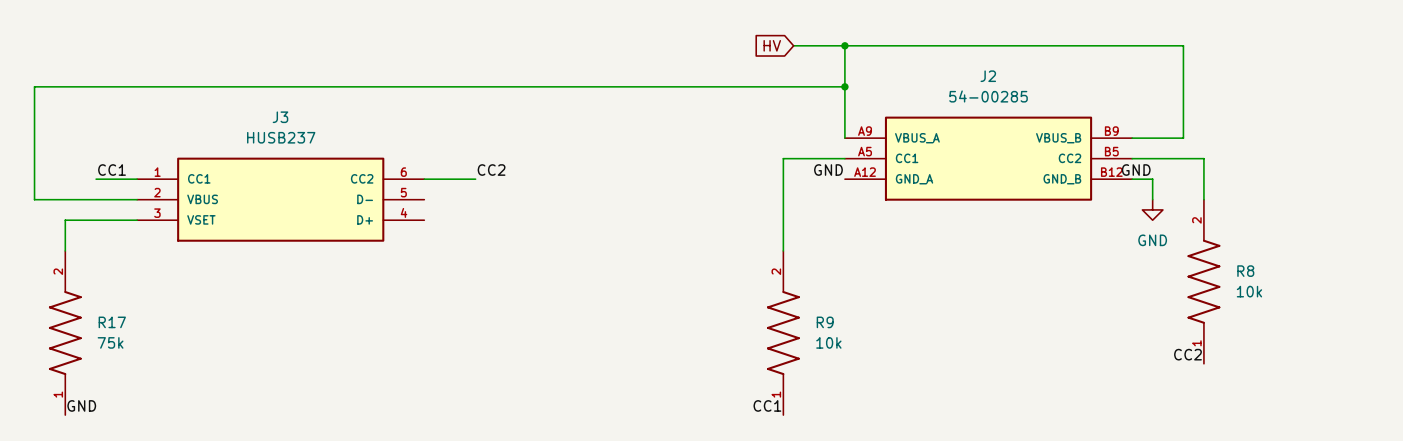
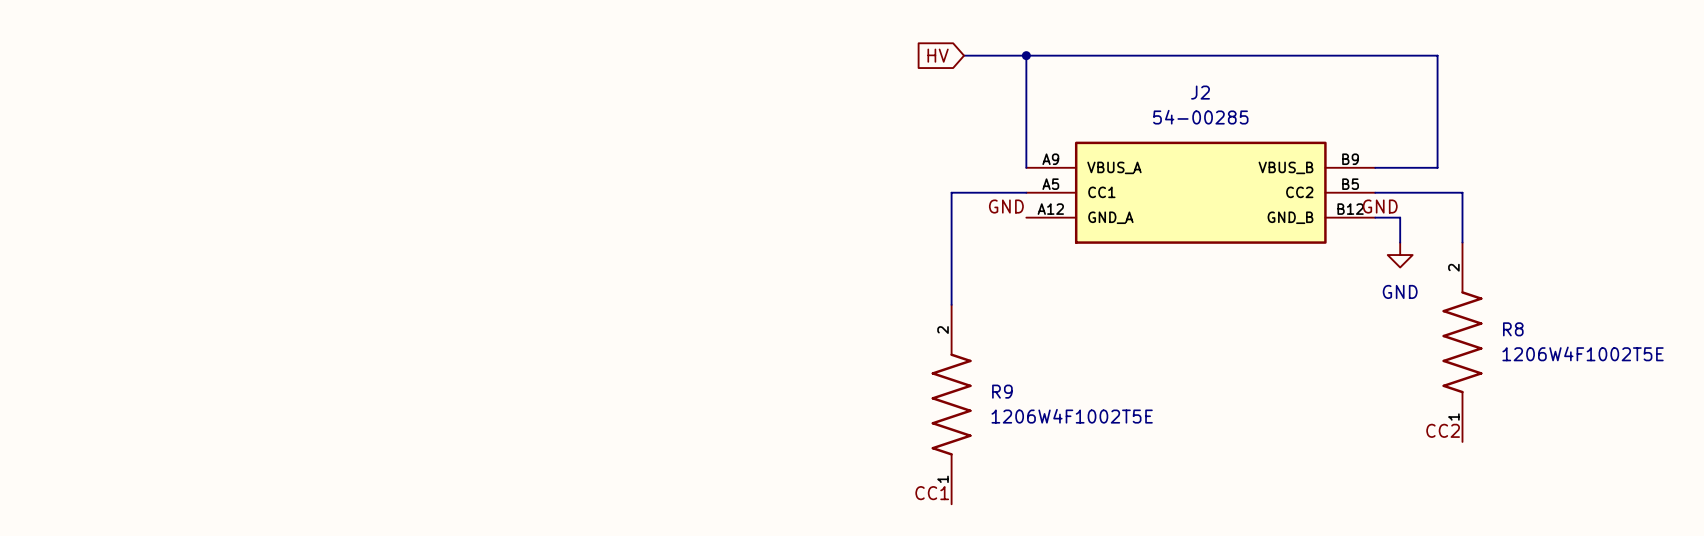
wire: (844, 86) (34, 86) (34, 199) (137, 199) -> none
junction: (844, 86) -> none
label: CC1 (112, 170) -> none
label: CC2 (491, 170) -> none
wire: (96, 179) (137, 179) -> none
wire: (424, 179) (475, 179) -> none
J3: HUSB237 (280, 199) -> none
wire: (137, 220) (65, 220) (65, 250) -> none
R8 value: 10k (1249, 291) -> 1206W4F1002T5E (1583, 353)
R17: 75k (65, 333) -> none
R9 value: 10k (828, 342) -> 1206W4F1002T5E (1072, 416)
label: GND (81, 405) -> none

